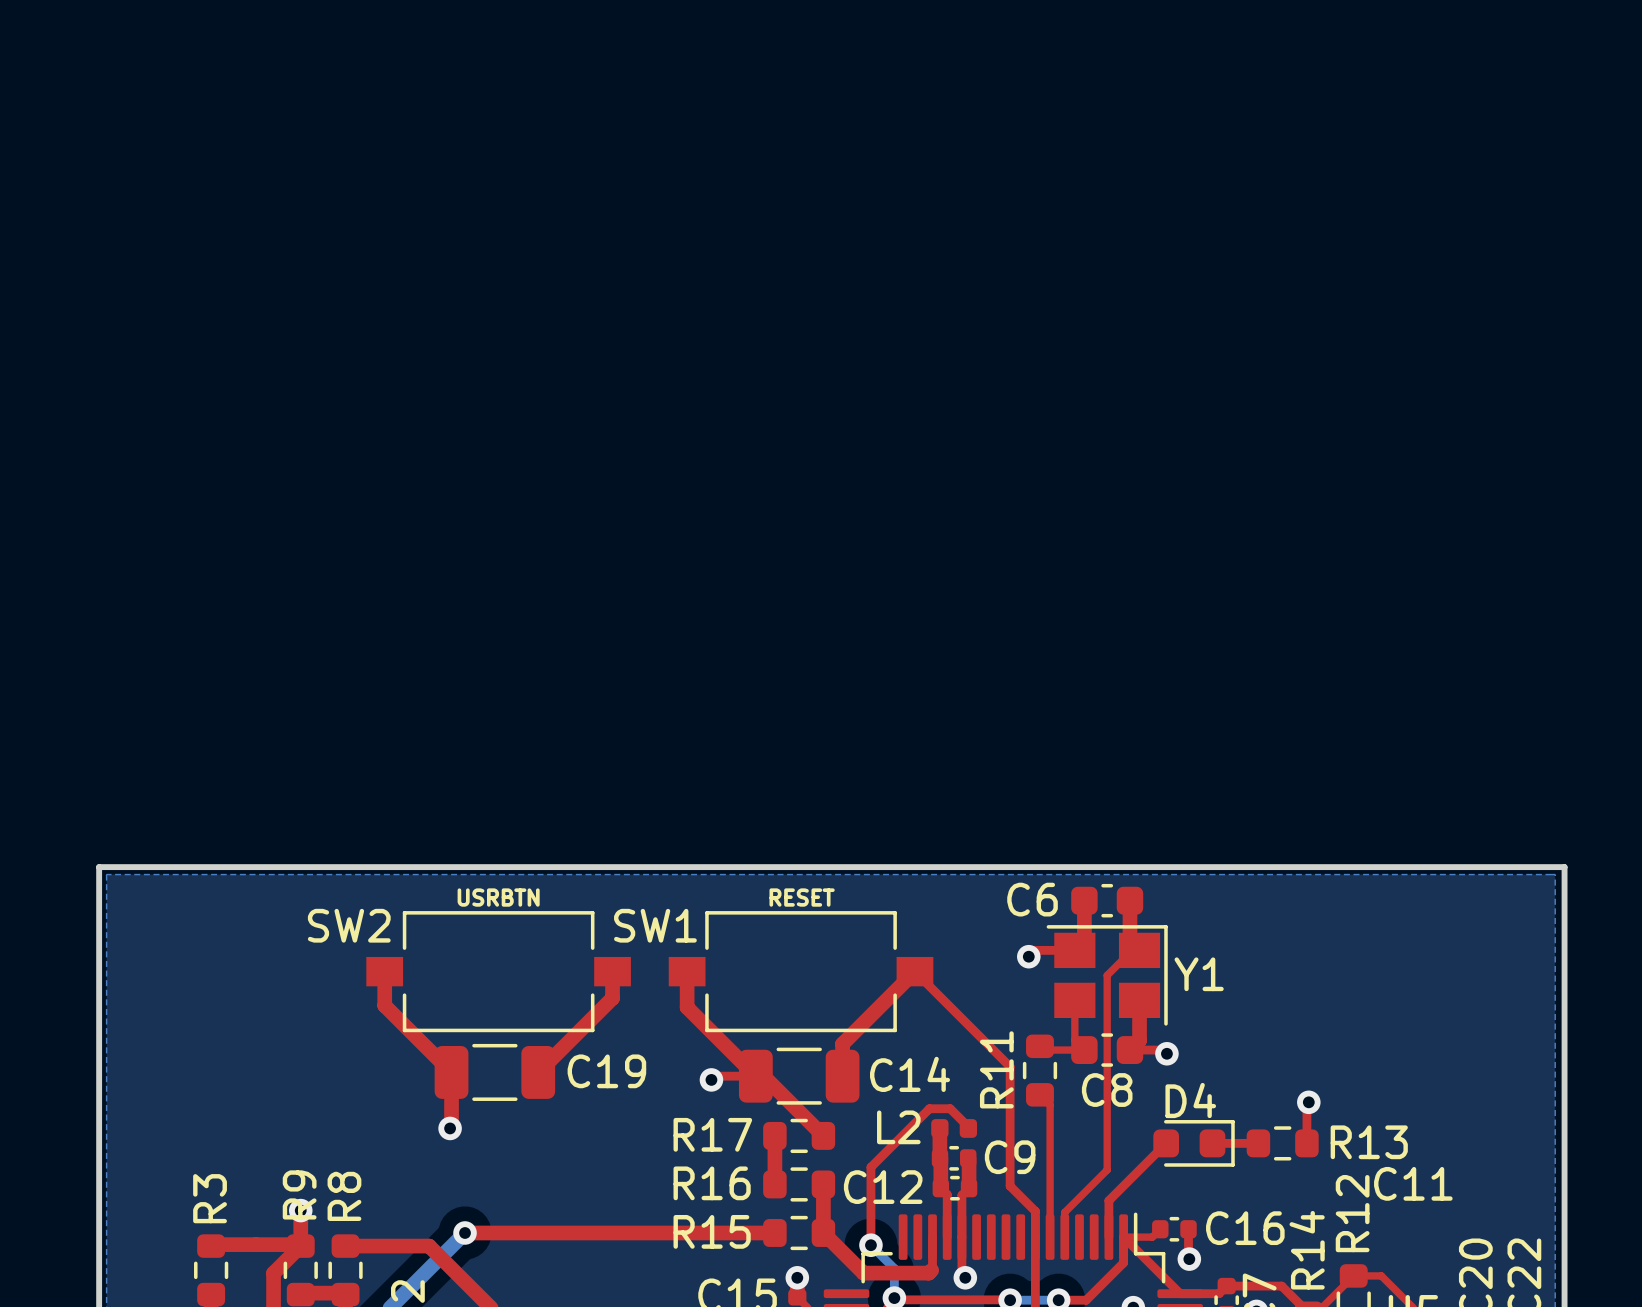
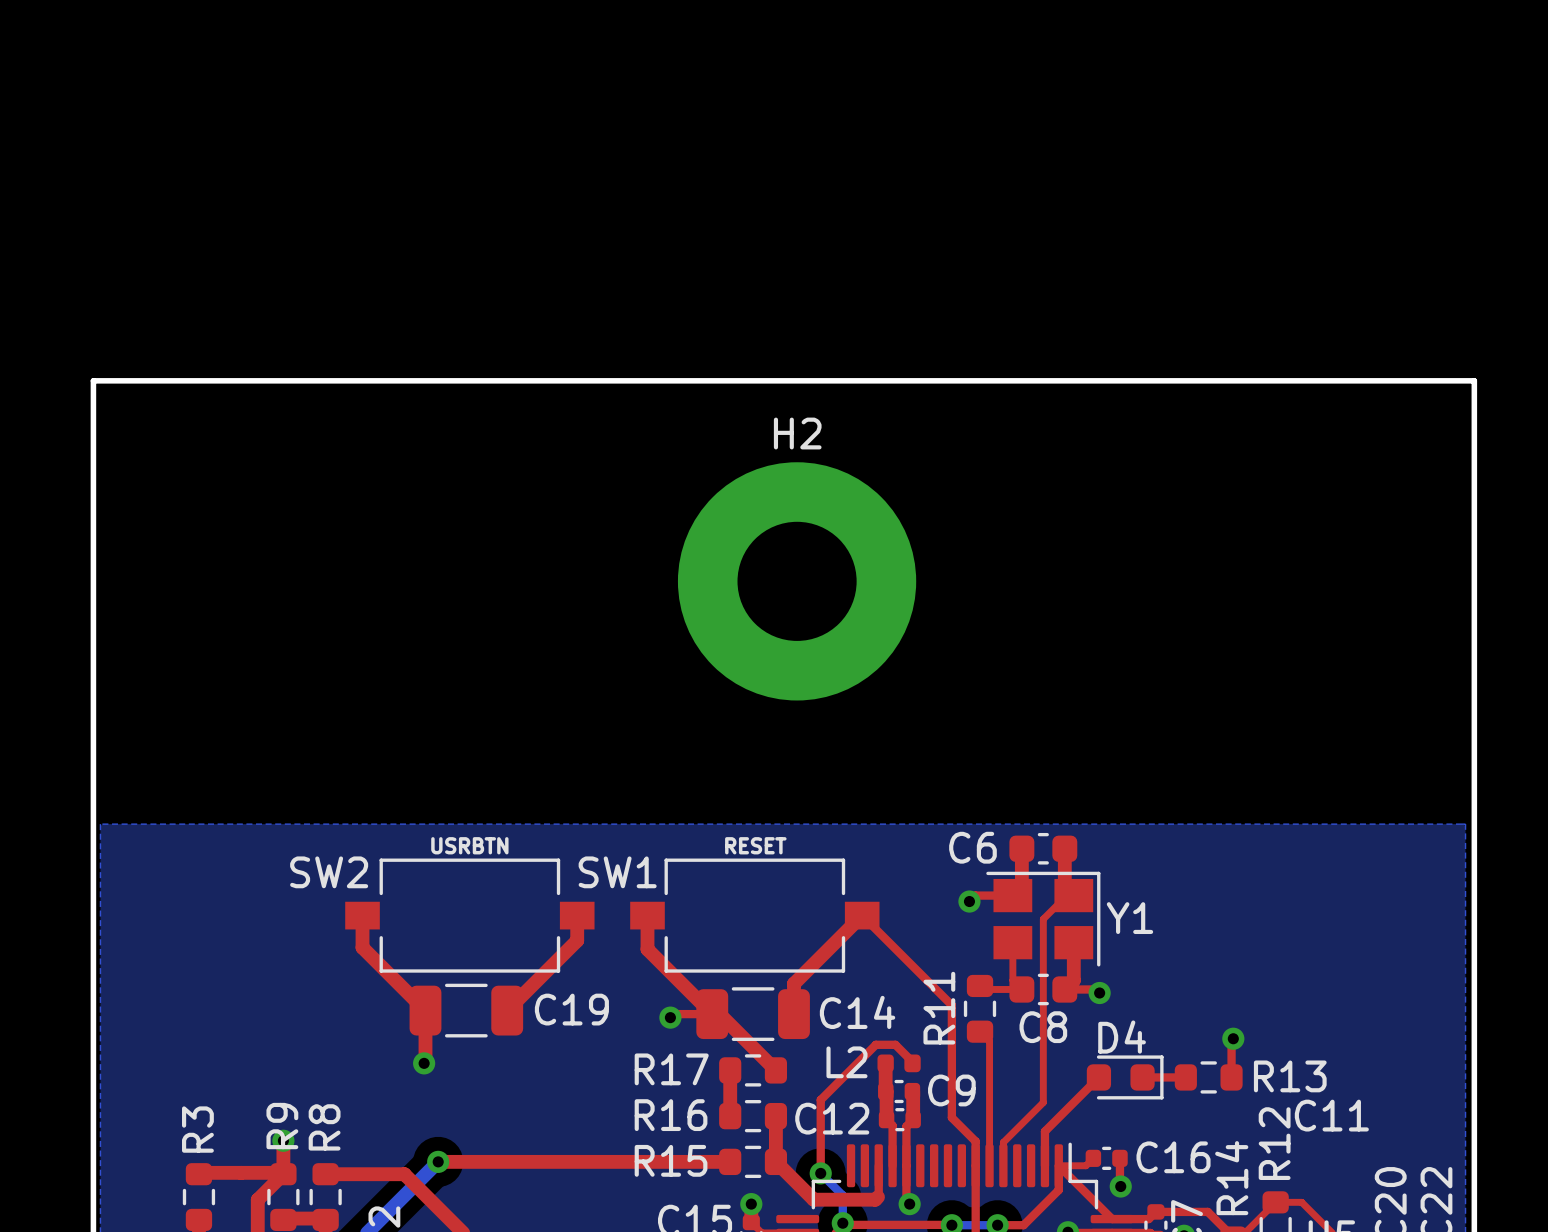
H2: none -> (797, 581)
board edge: (99, 867) (1564, 867) -> (93, 817) (93, 380) (1474, 380) (1474, 817)

